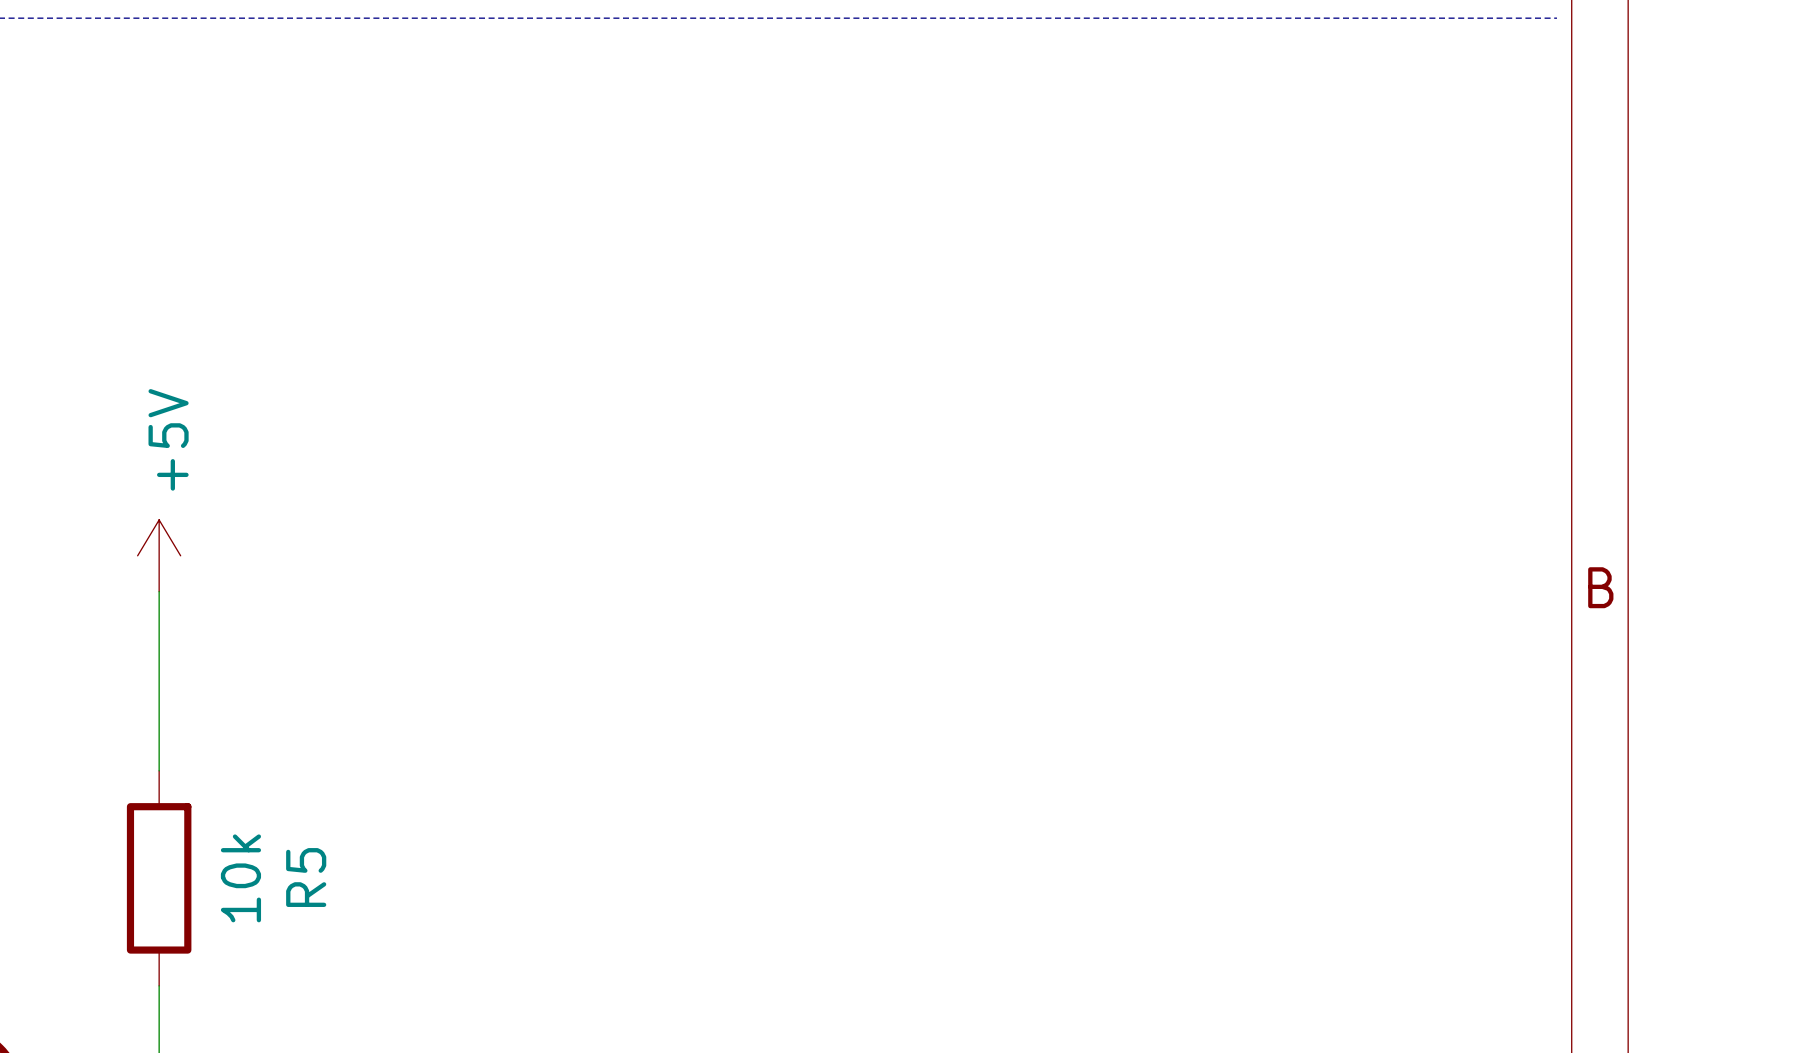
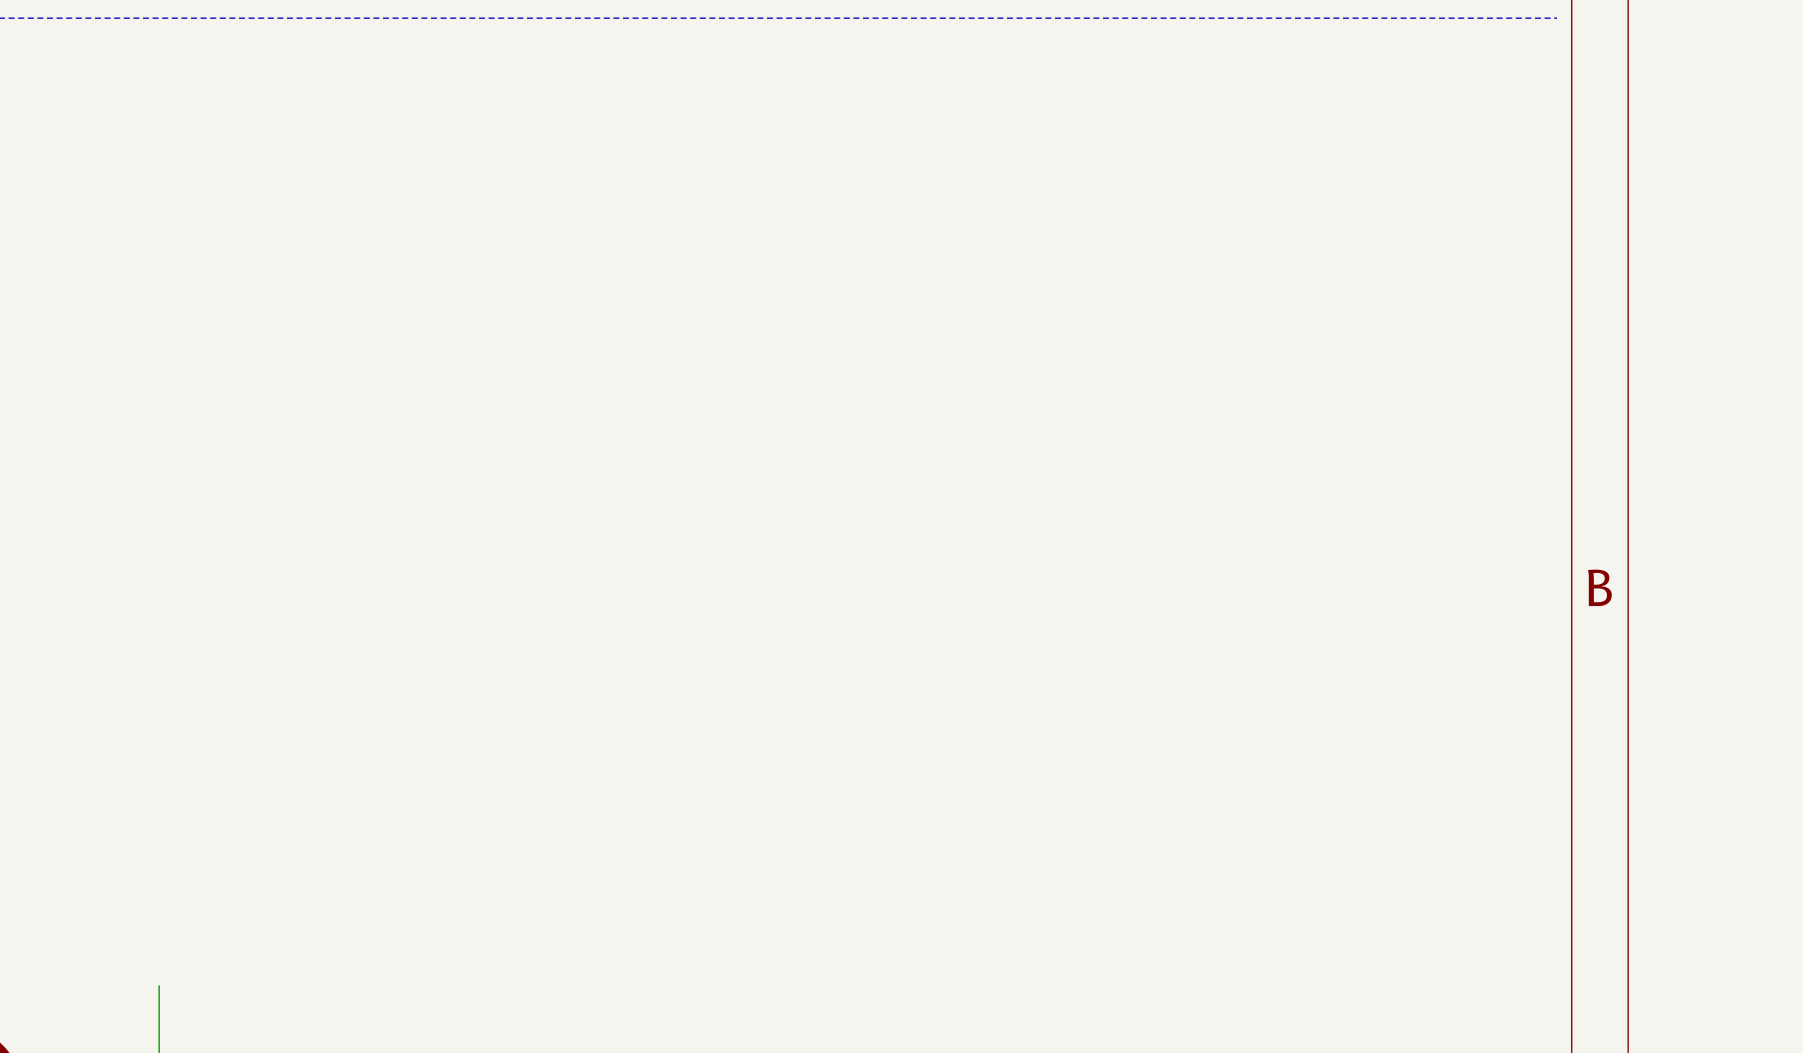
power symbol: +5V (159, 555) -> none
wire: (159, 591) (159, 770) -> none
R5: 10k (159, 878) -> none

